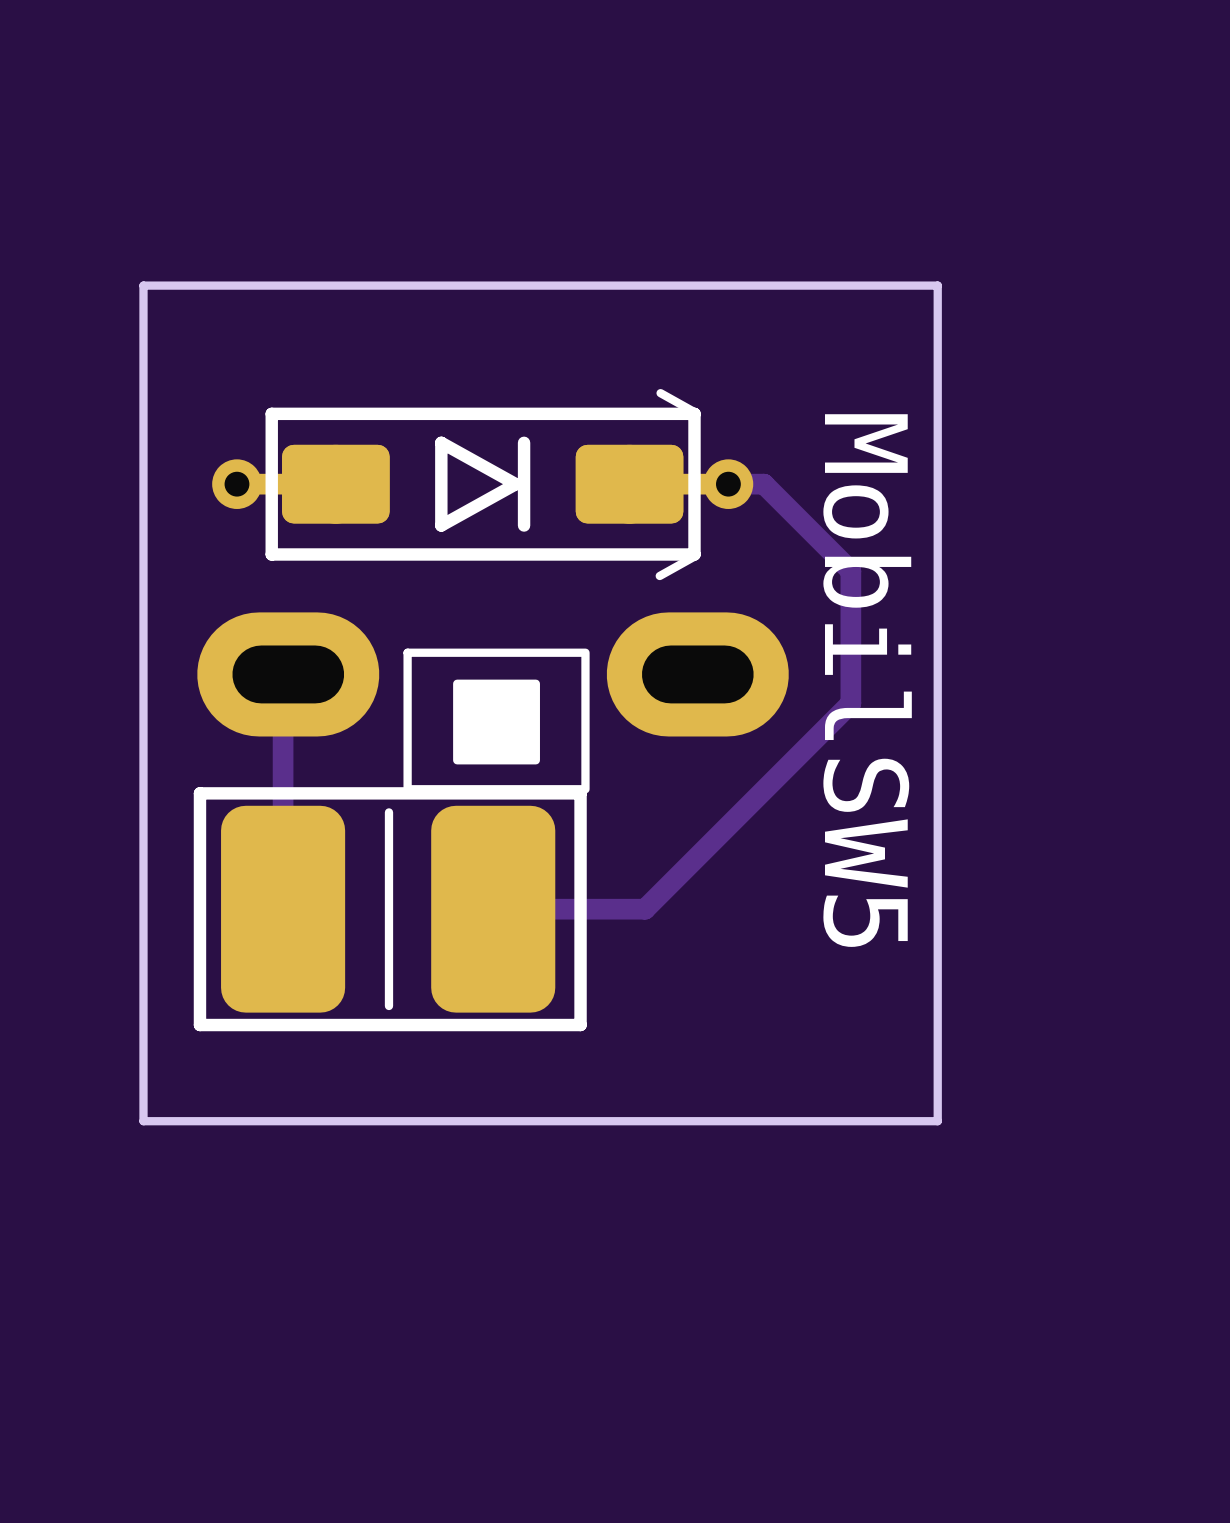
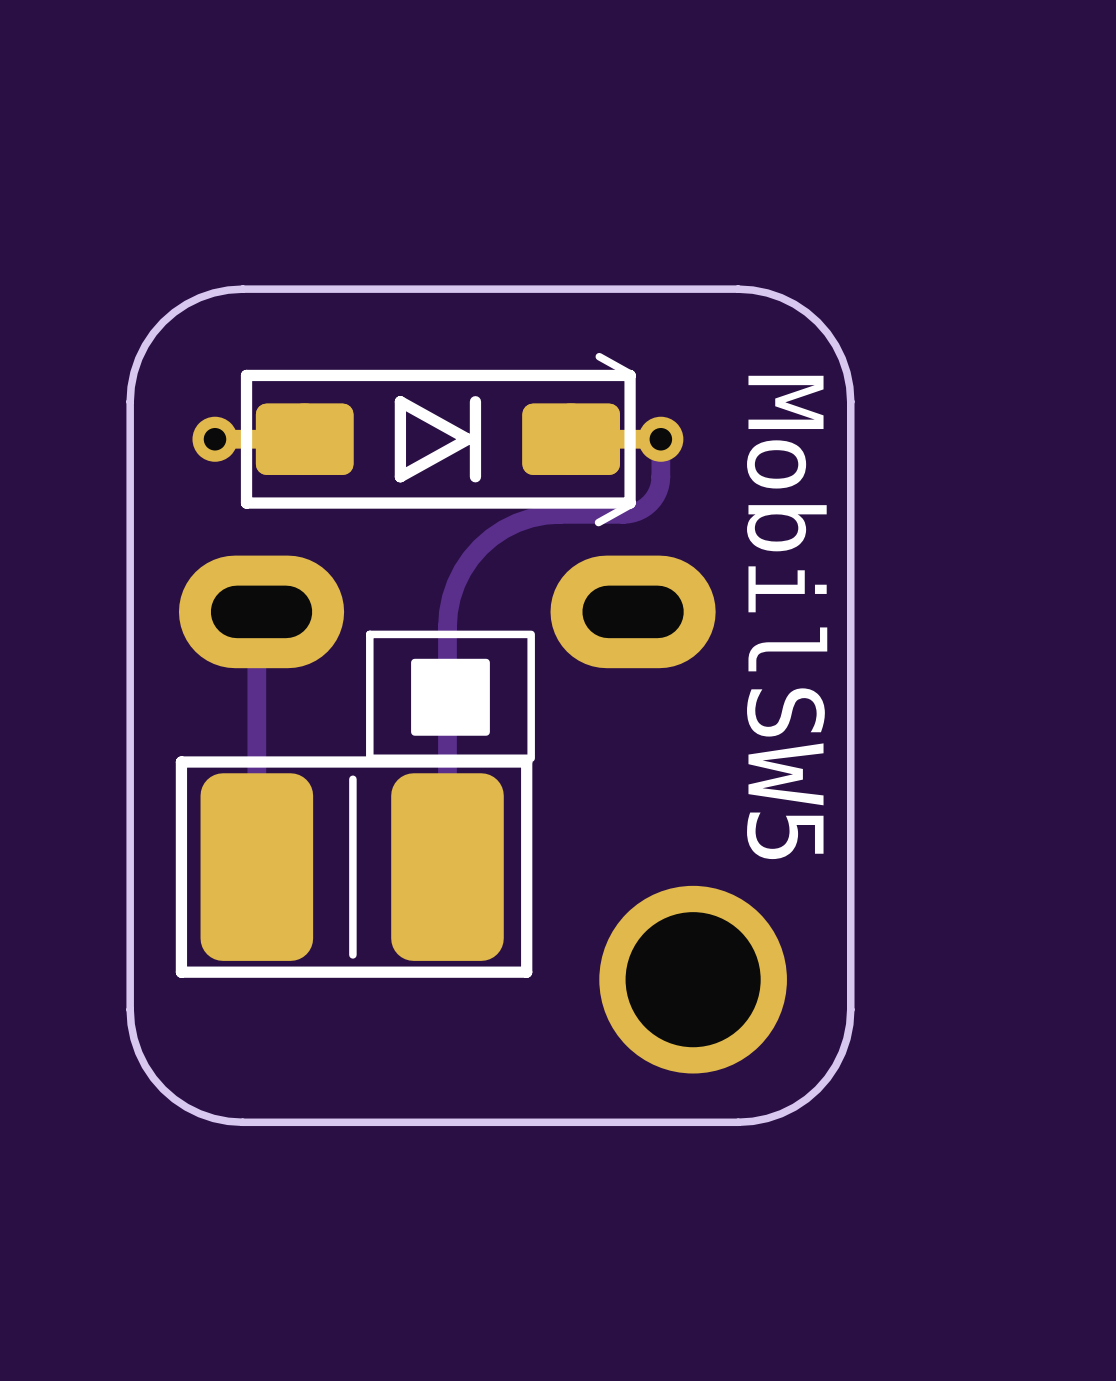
board edge: (937, 442) (937, 285) (143, 285) (143, 442) -> (850, 401) (849, 387) (842, 358) (835, 345) (817, 322) (794, 304) (781, 297) (767, 292) (738, 289) (228, 290) (213, 292) (186, 304) (163, 322) (153, 333) (138, 358) (134, 372) (130, 401)
track: (728, 484) (763, 484) (850, 571) (850, 703) (645, 909) (493, 909) -> (660, 439) (659, 486) (653, 499) (642, 509) (623, 514) (545, 515) (516, 522) (491, 537) (470, 558) (462, 570) (451, 597) (447, 626) (447, 867)
part position: (391, 839) -> (355, 804)
part: none -> (693, 979)
board edge: (937, 1112) (937, 1121) (143, 1121) (143, 1112) -> (850, 1009) (846, 1038) (842, 1052) (827, 1078) (817, 1089) (806, 1099) (781, 1113) (752, 1121) (738, 1122) (228, 1121) (199, 1113) (174, 1099) (163, 1089) (145, 1065) (138, 1052) (131, 1024) (130, 1009)

